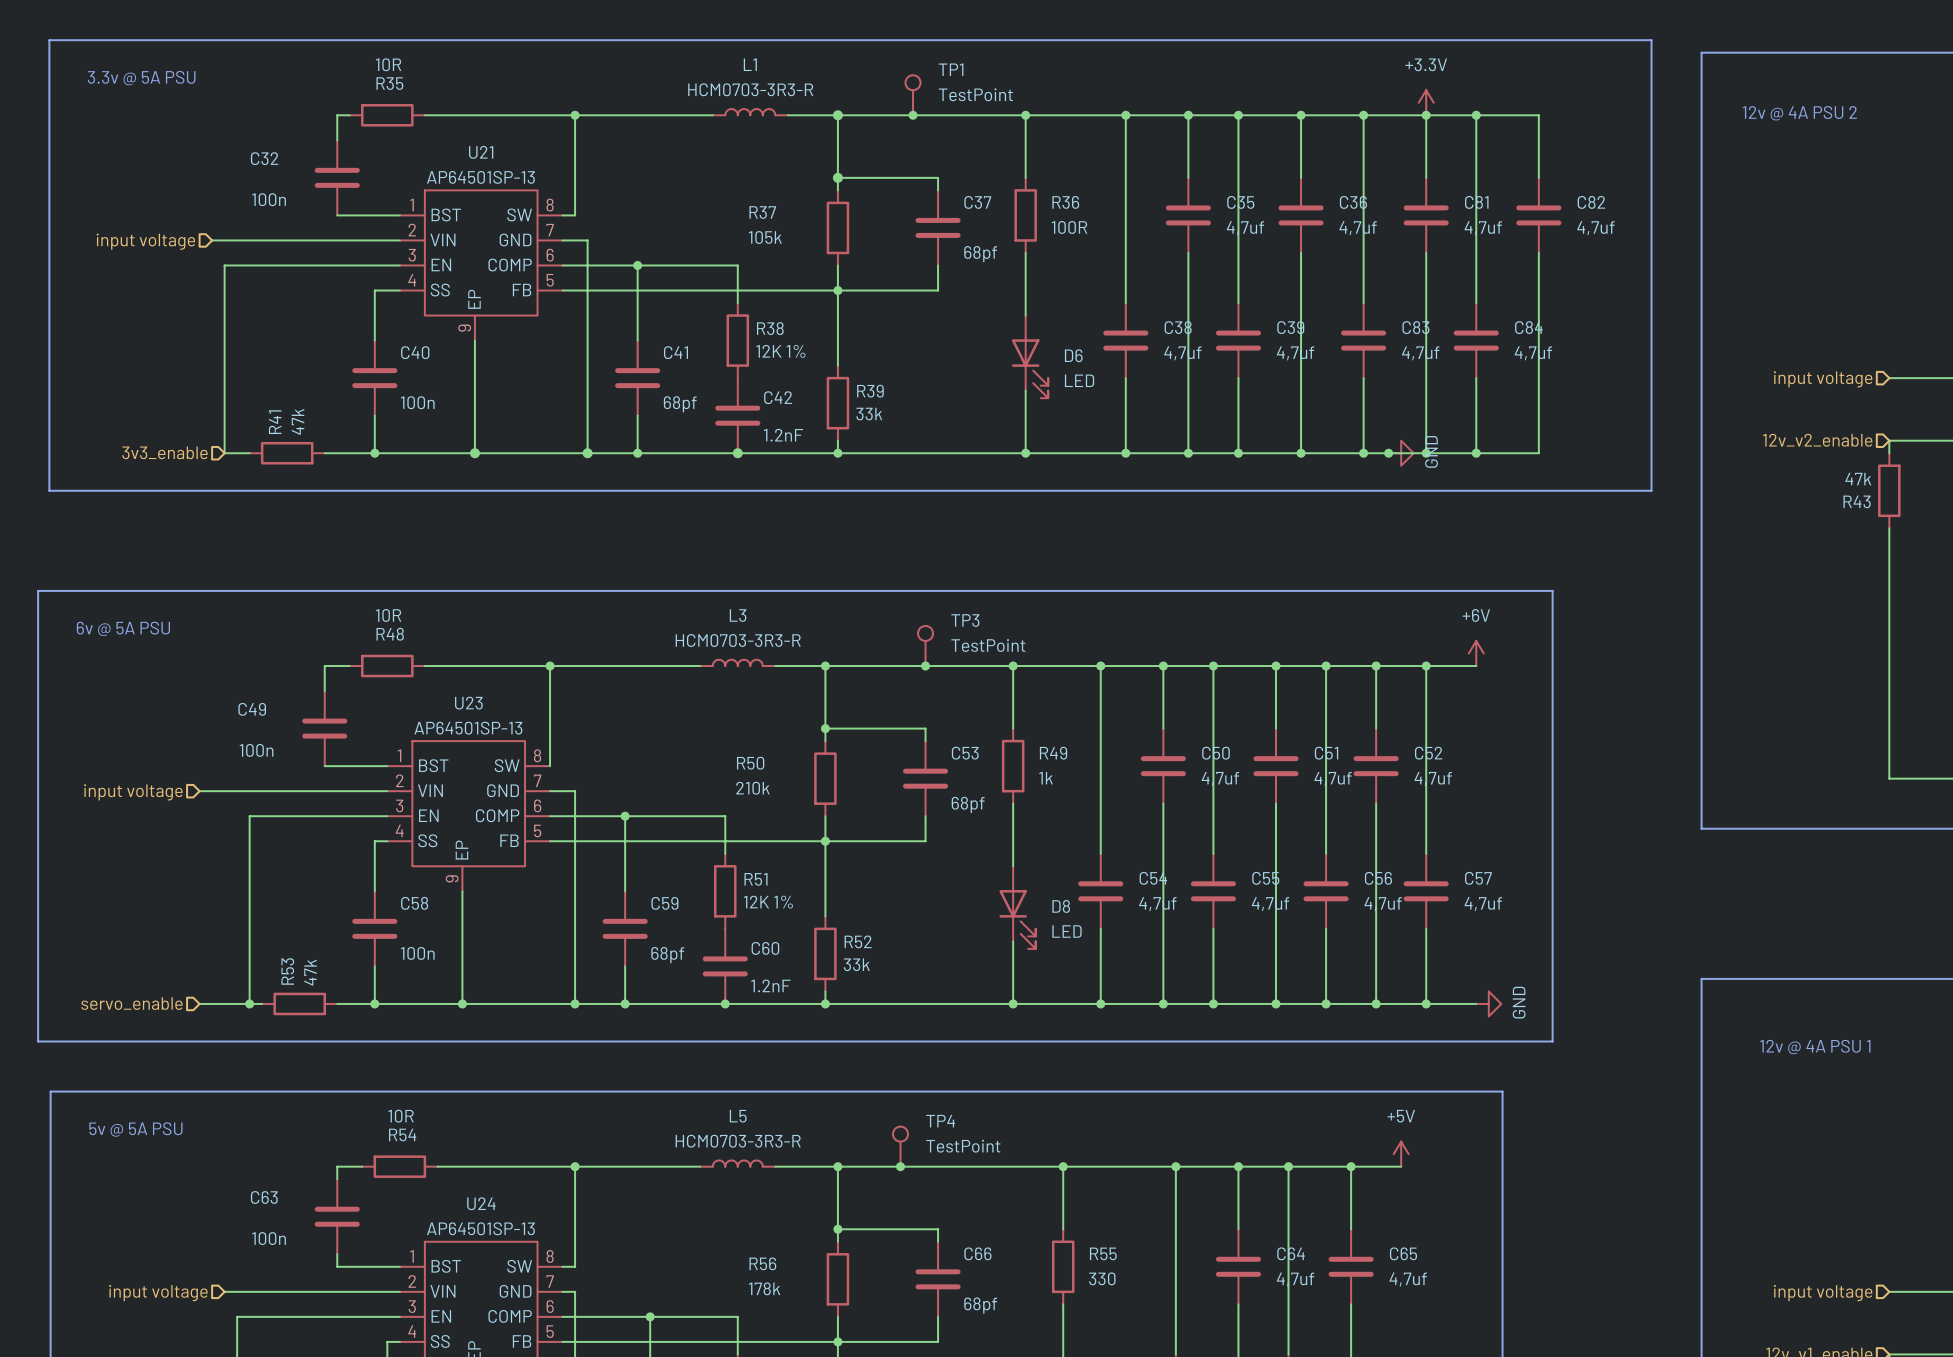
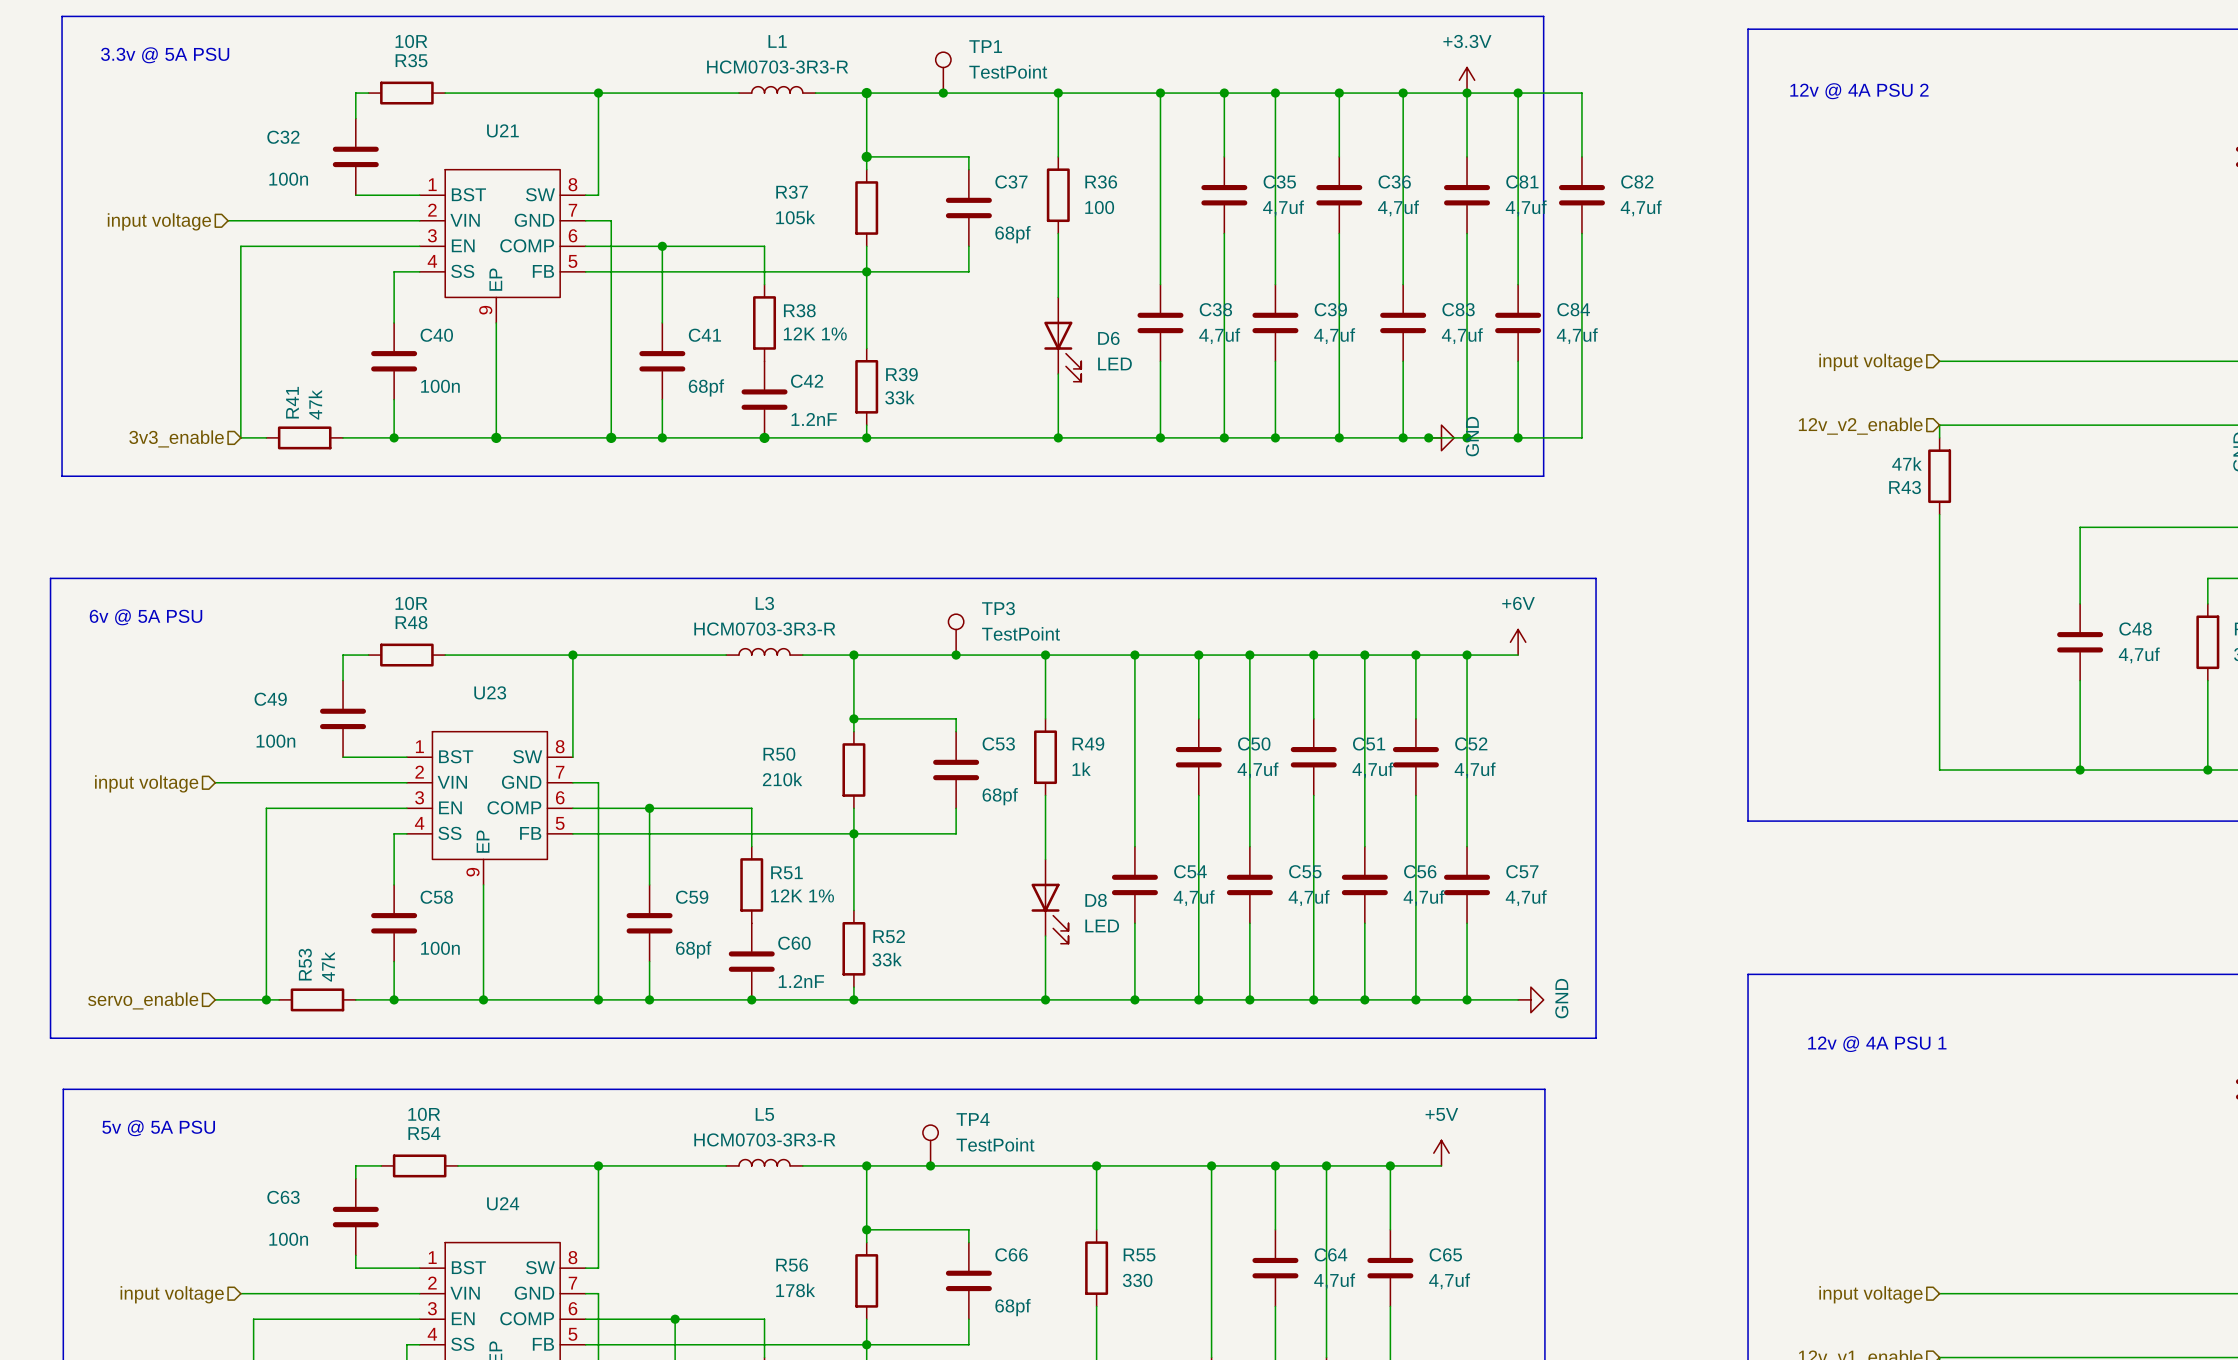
line: (1501, 40) (1651, 40) (1651, 490) (1501, 490) -> (1543, 16) (1543, 476)
U21 value: AP64501SP-13 (480, 177) -> none
R36 value: 100R (1069, 227) -> 100 (1099, 207)
U23 value: AP64501SP-13 (468, 728) -> none
U24 value: AP64501SP-13 (480, 1228) -> none

